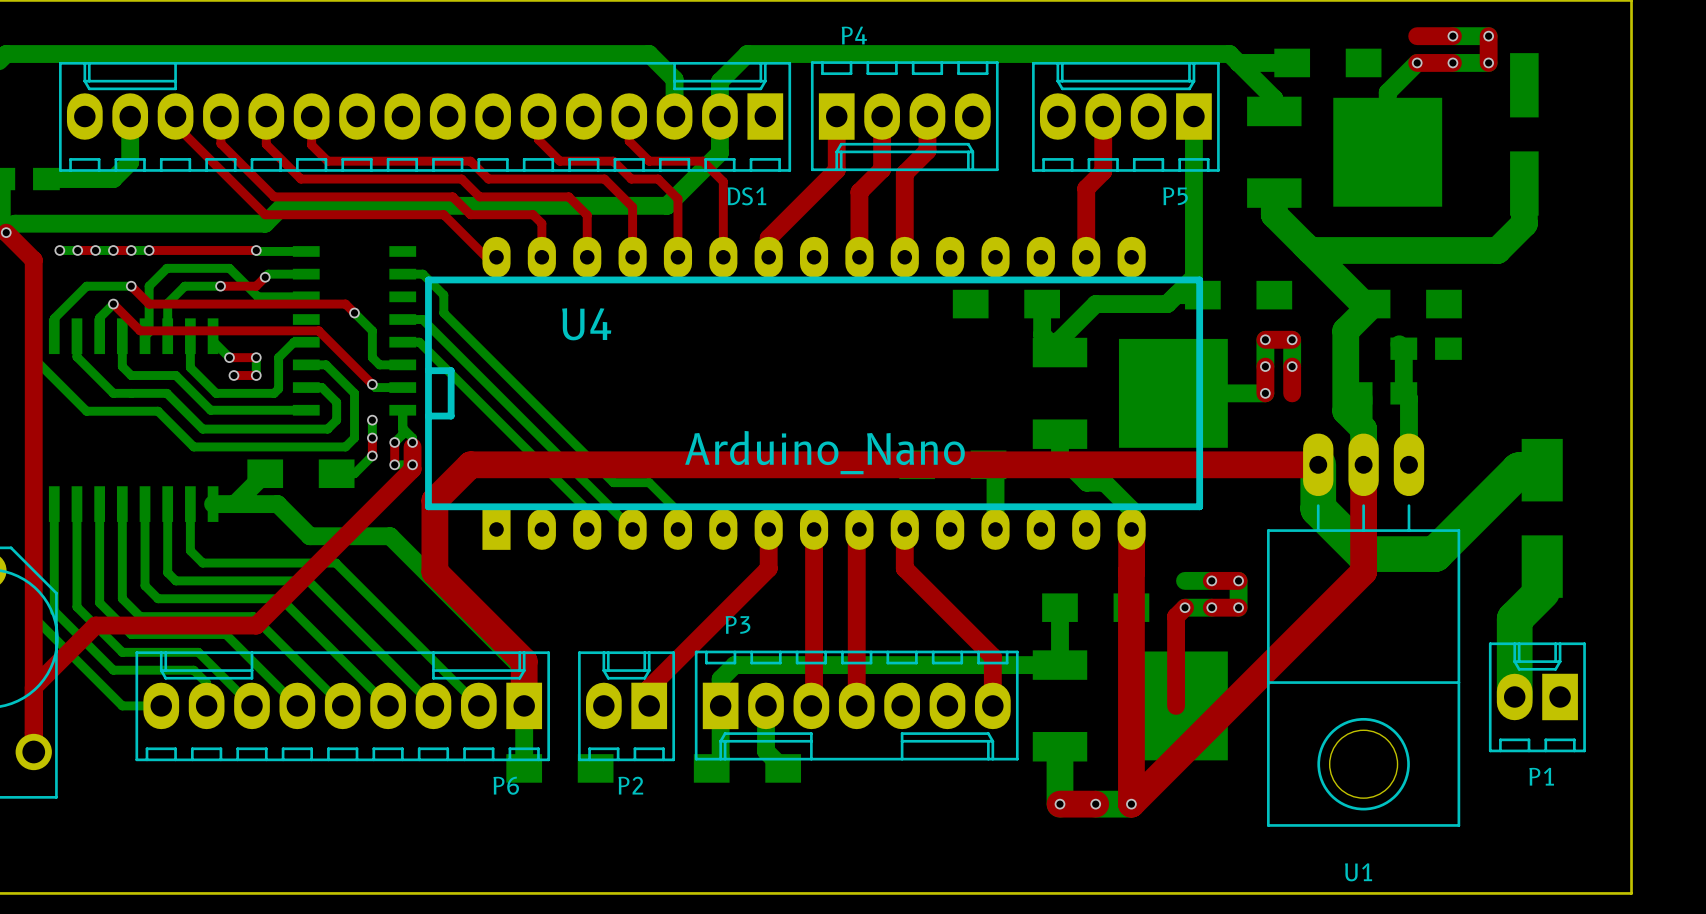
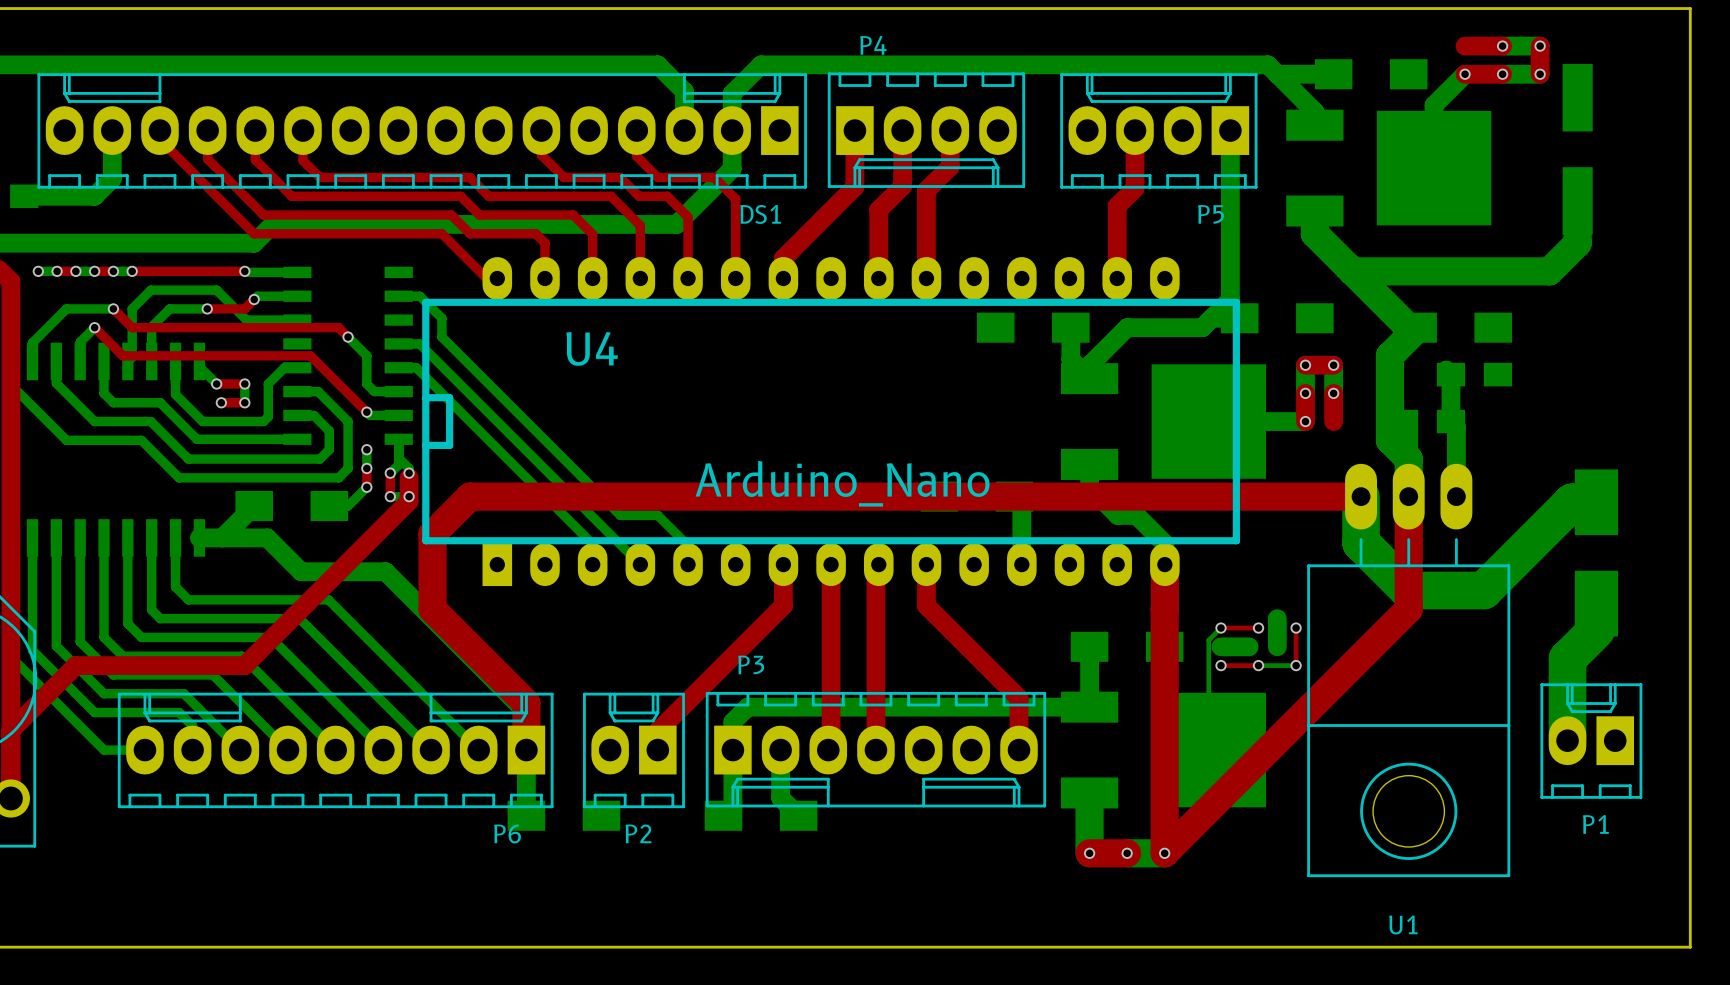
bottom track: (1185, 580) (1211, 580) -> none
top track: (1211, 580) (1238, 580) -> none
via position: (1211, 580) -> (1258, 628)
via: (1238, 580) -> none
top track: none -> (1221, 628) (1258, 628)
bottom track: none -> (1221, 628) (1208, 640) (1208, 750)
via: none -> (1221, 628)
top track: none -> (1296, 628) (1296, 665)
via: none -> (1296, 628)
top track: (1185, 607) (1176, 616) (1176, 705) -> none
via: (1185, 607) -> none
top track: (1211, 607) (1238, 607) -> none
via: (1211, 607) -> none
via: (1238, 607) -> none
top track: none -> (1221, 665) (1258, 665)
via: none -> (1221, 665)
bottom track: none -> (1258, 665) (1296, 665)
via: none -> (1258, 665)
via: none -> (1296, 665)

